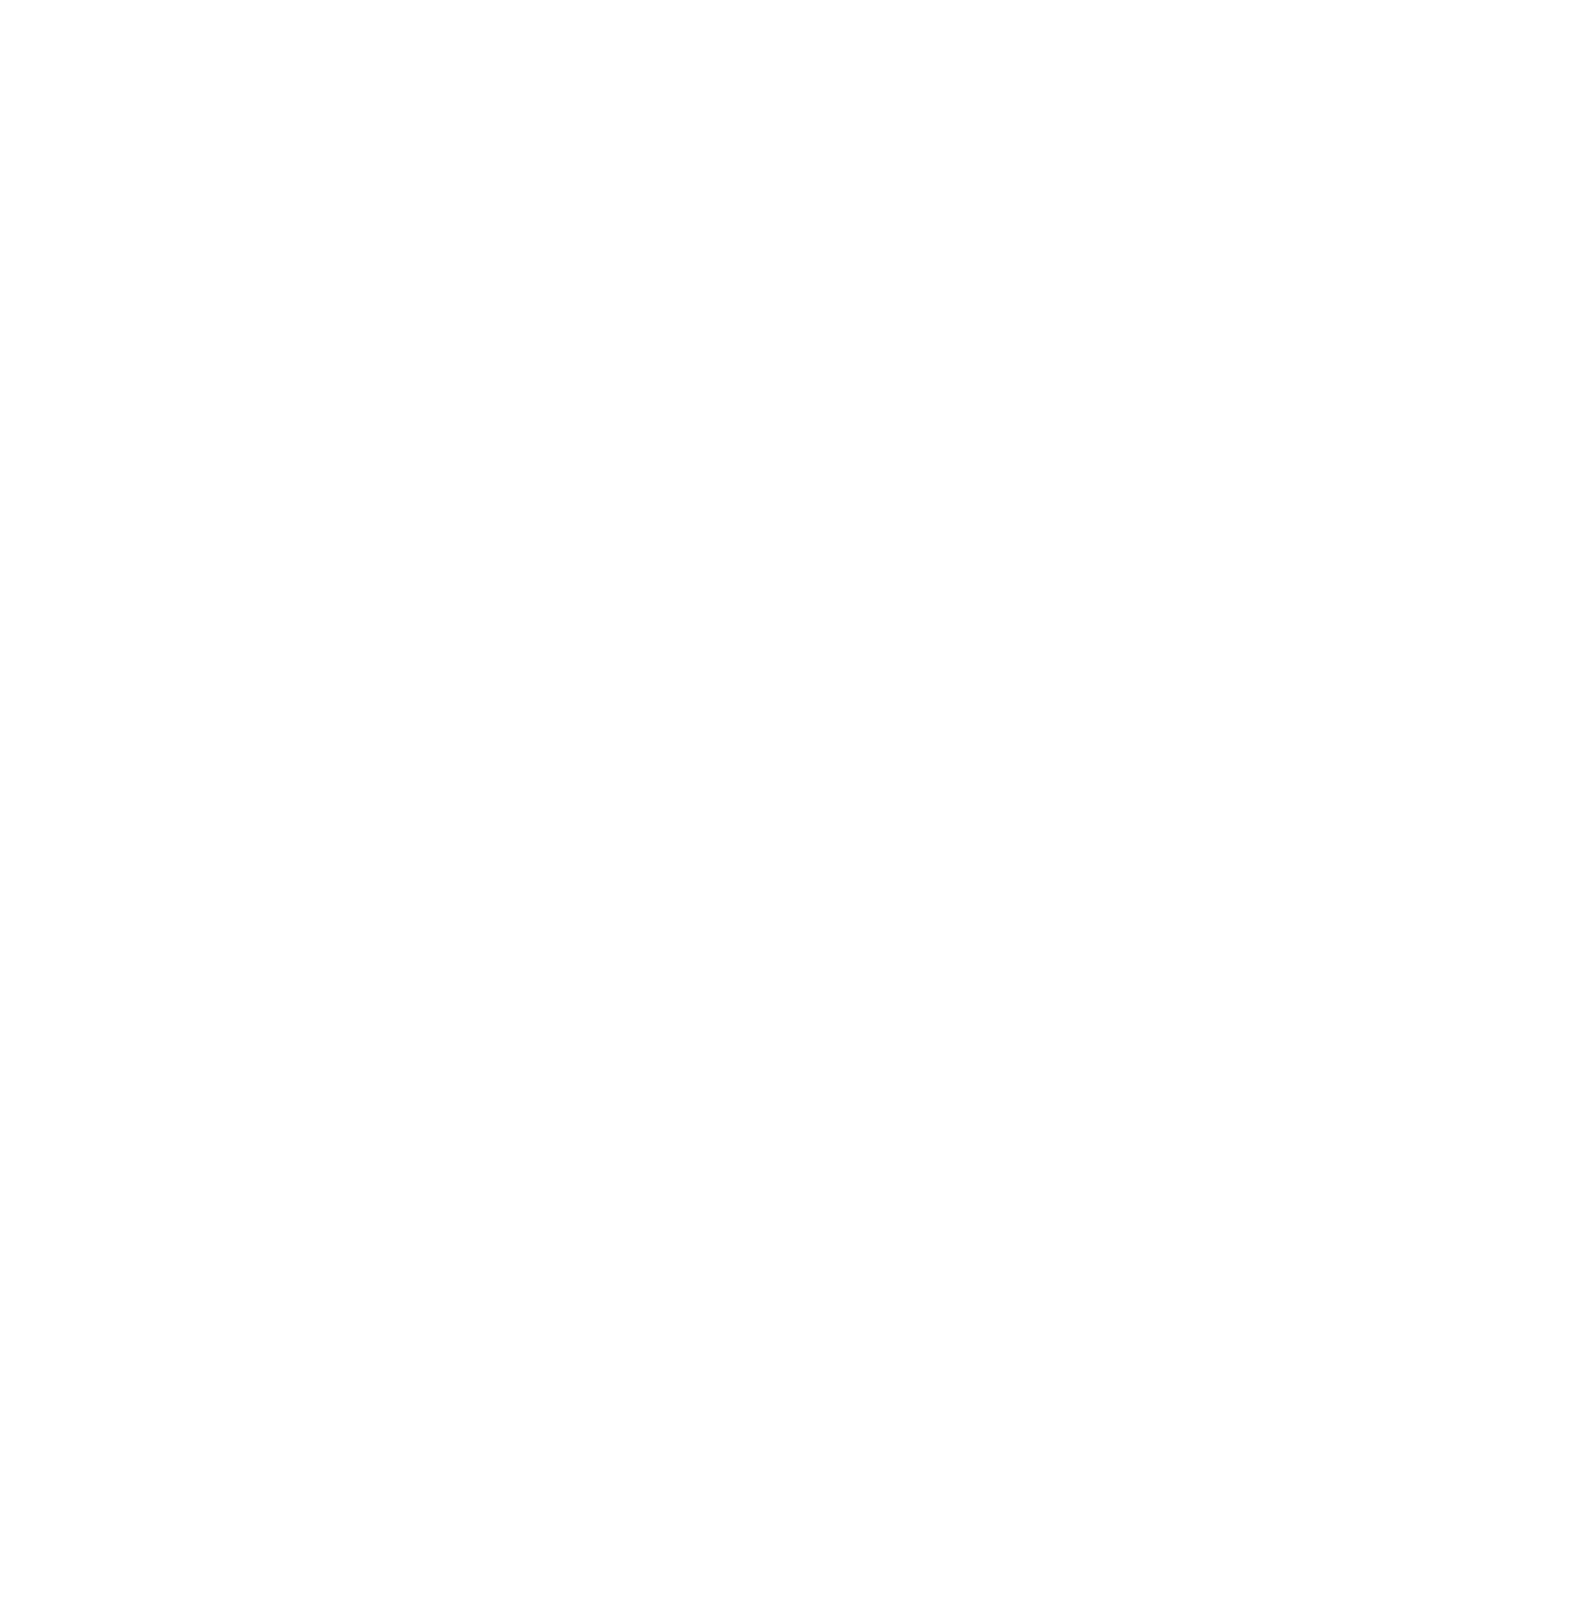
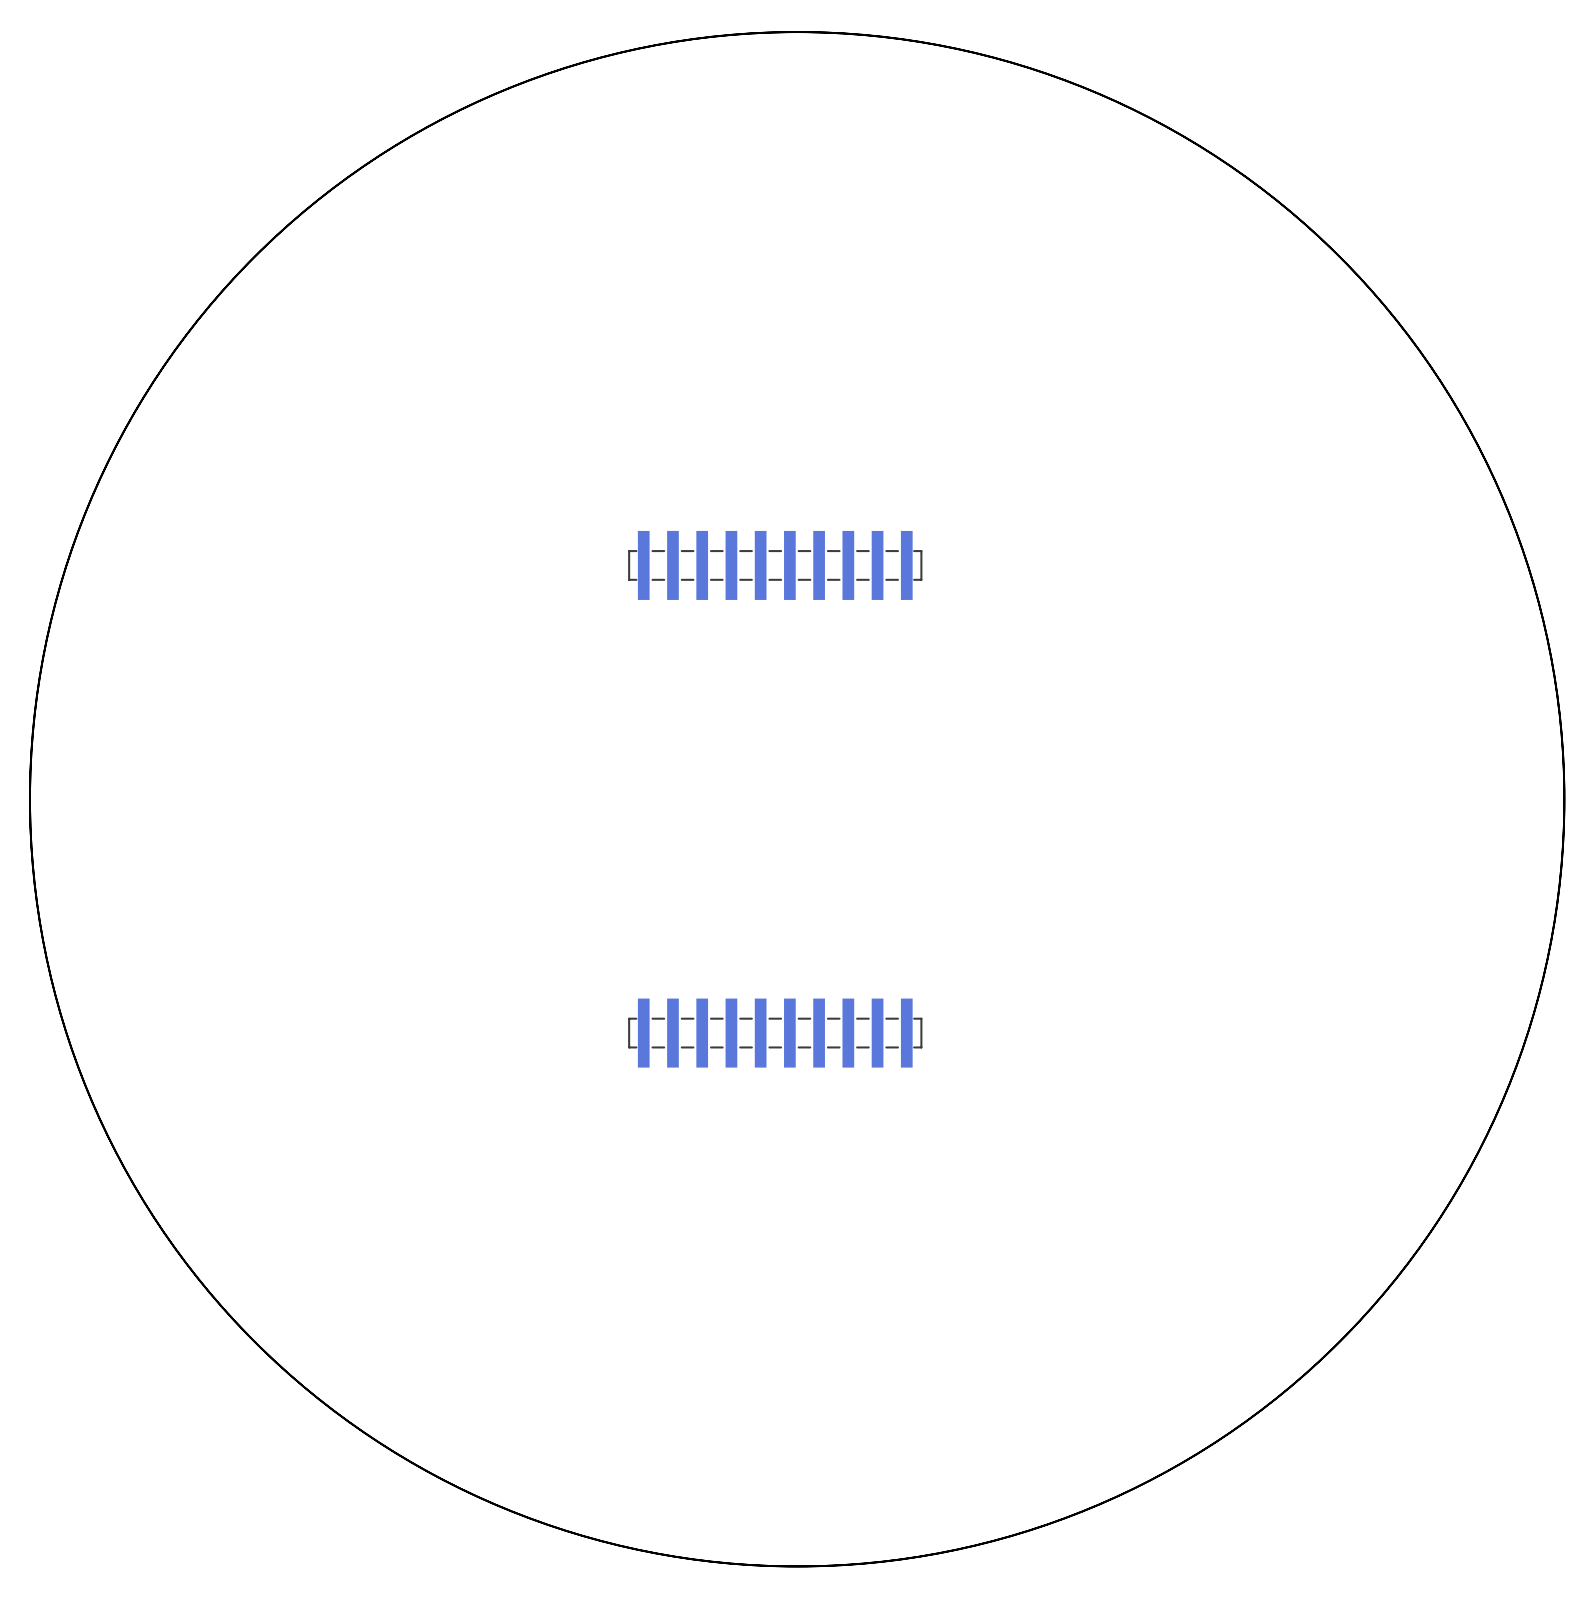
round board edge: none -> [29, 31, 1566, 1568]
part: none -> (775, 565)
part: none -> (775, 1033)

